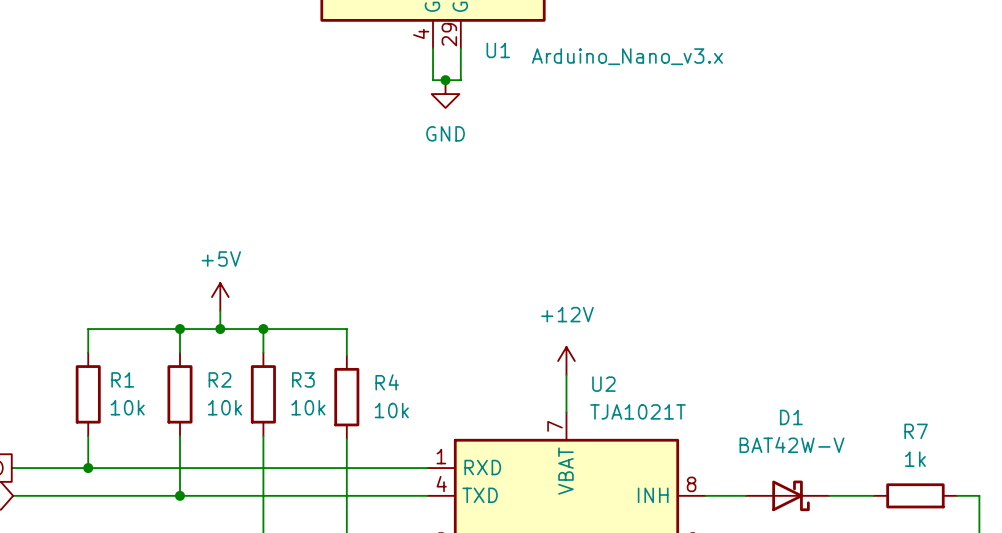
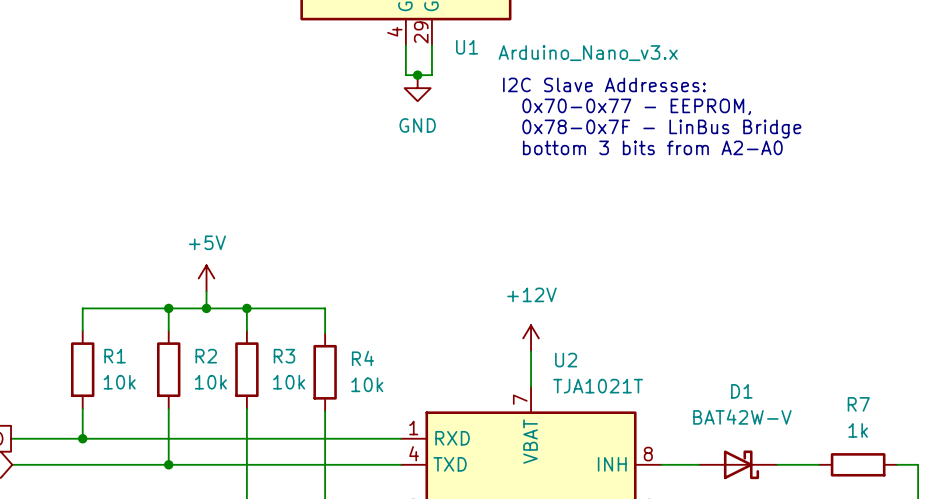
text: none -> I2C Slave Addresses: (604, 84)
text: none -> 0x70-0x77 - EEPROM, (636, 106)
text: none -> 0x78-0x7F - LinBus Bridge (661, 129)
text: none -> bottom 3 bits from A2-A0 (652, 147)

